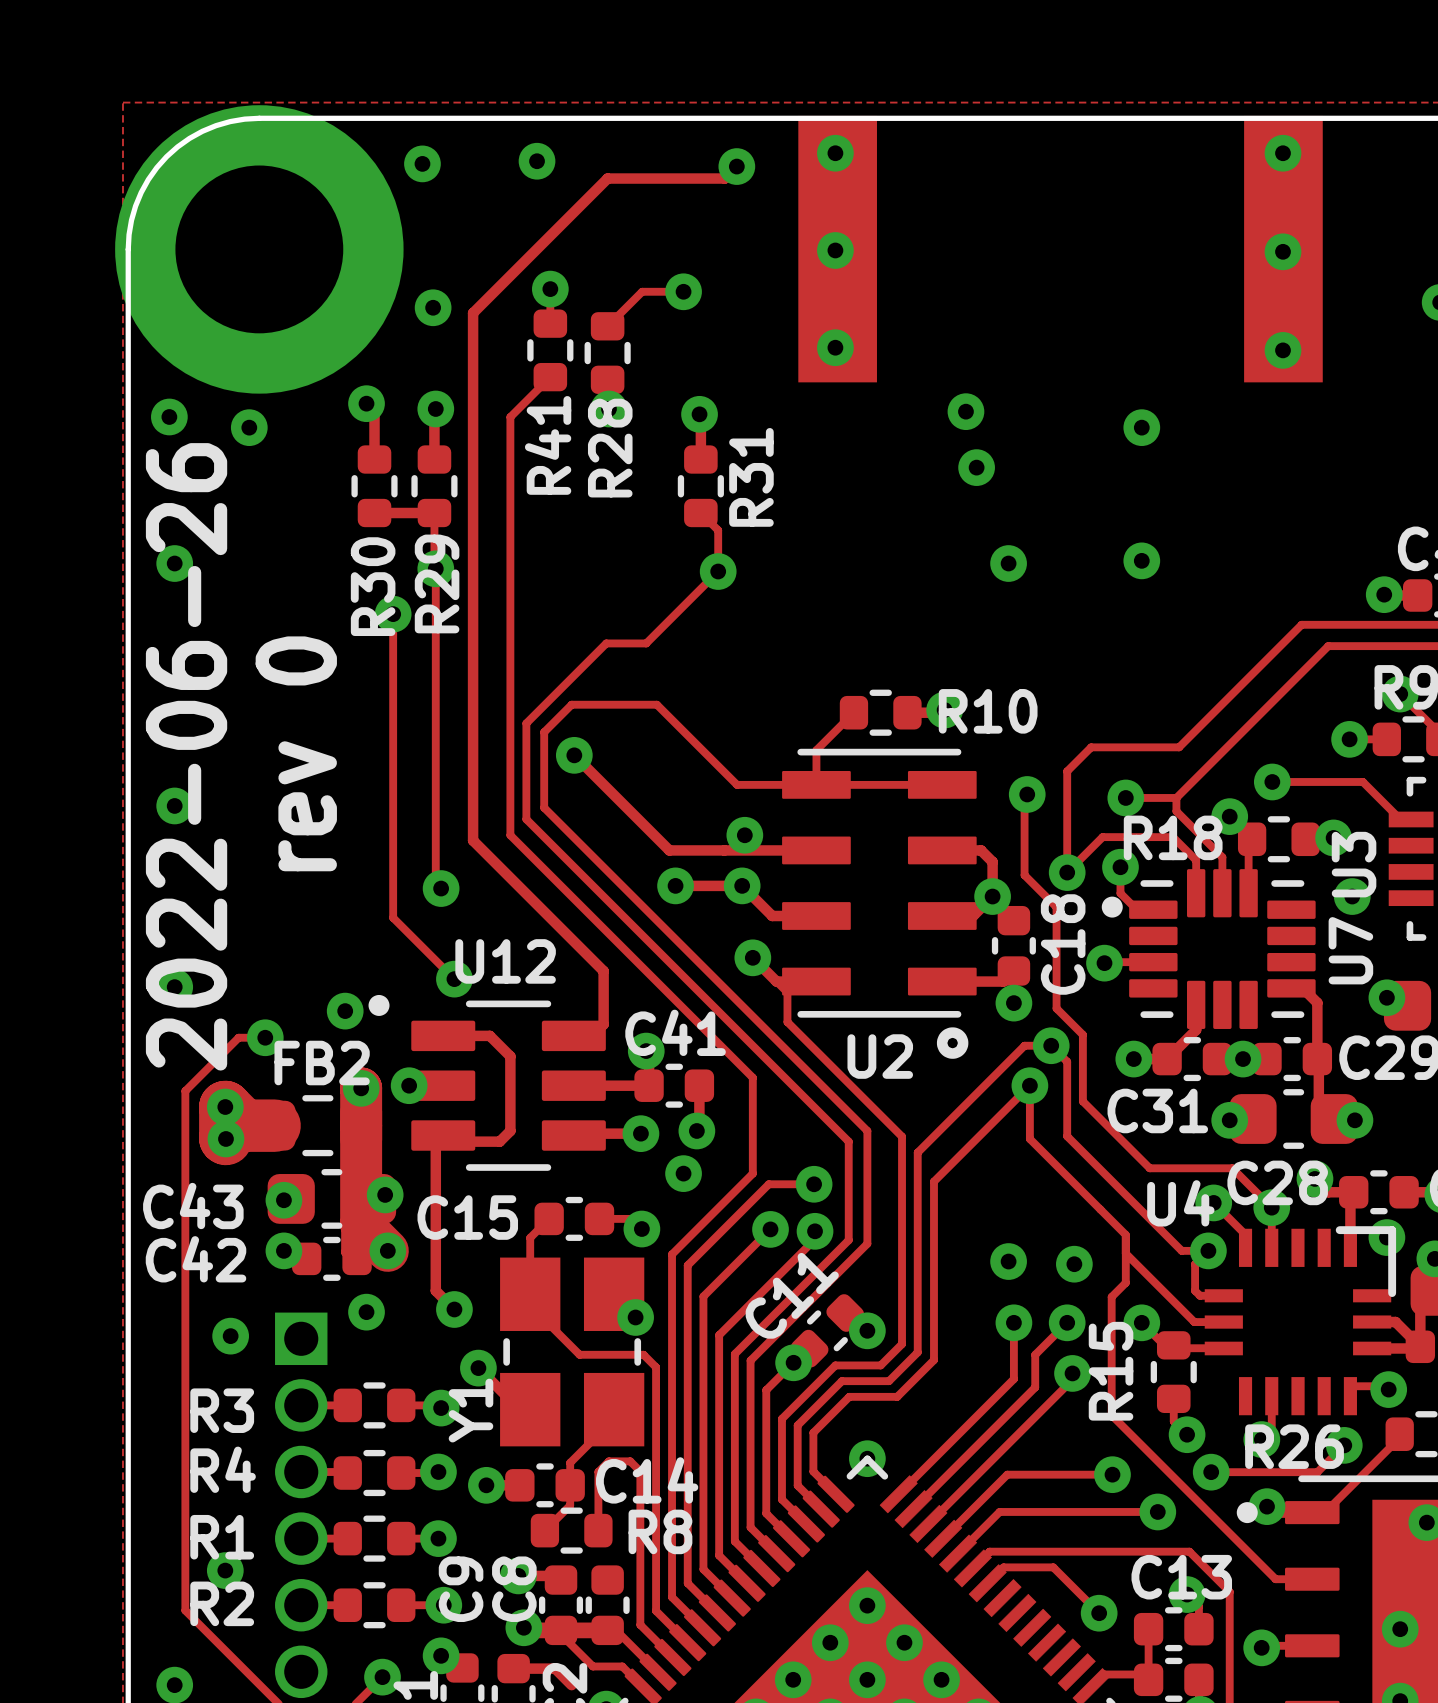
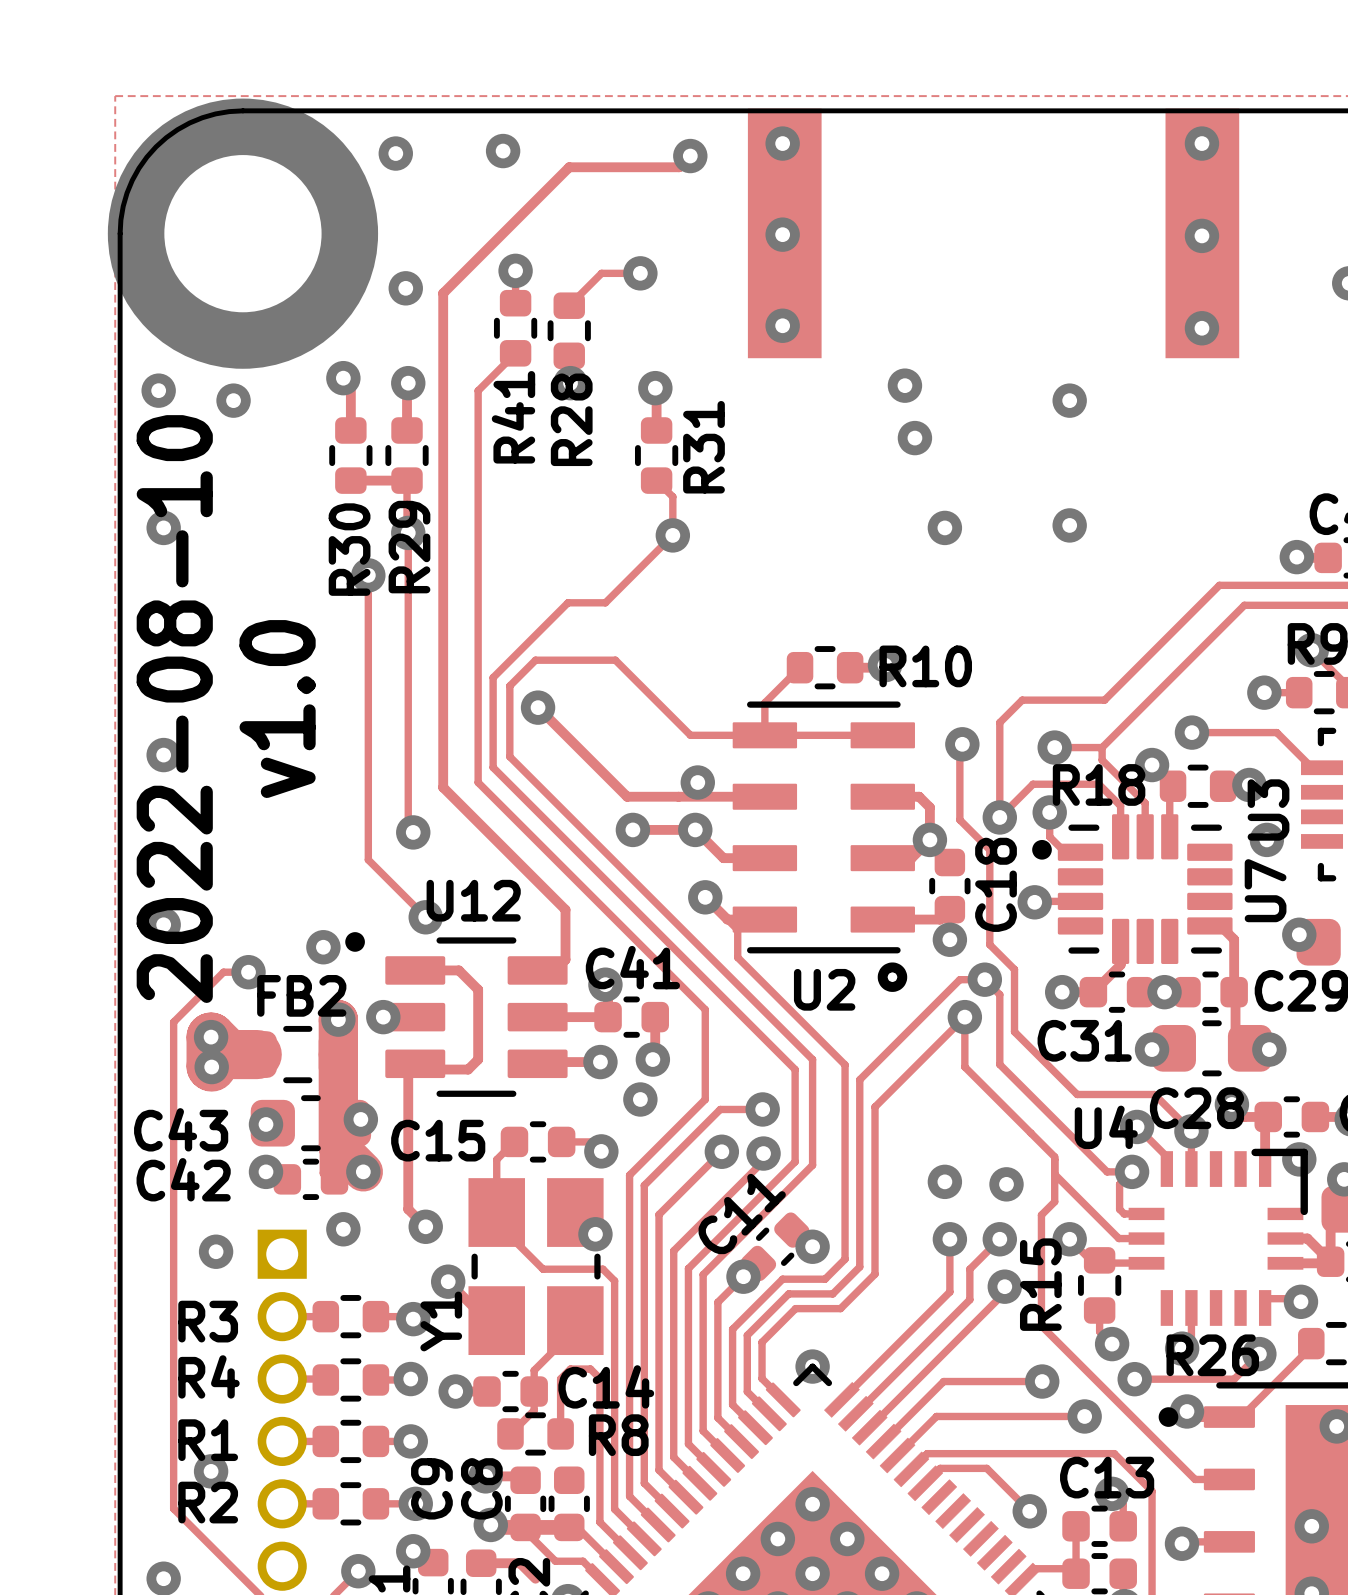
text: rev 0 (296, 753) -> v1.0 (277, 709)
text: 2022-06-26 (186, 756) -> 2022-08-10 (174, 709)

